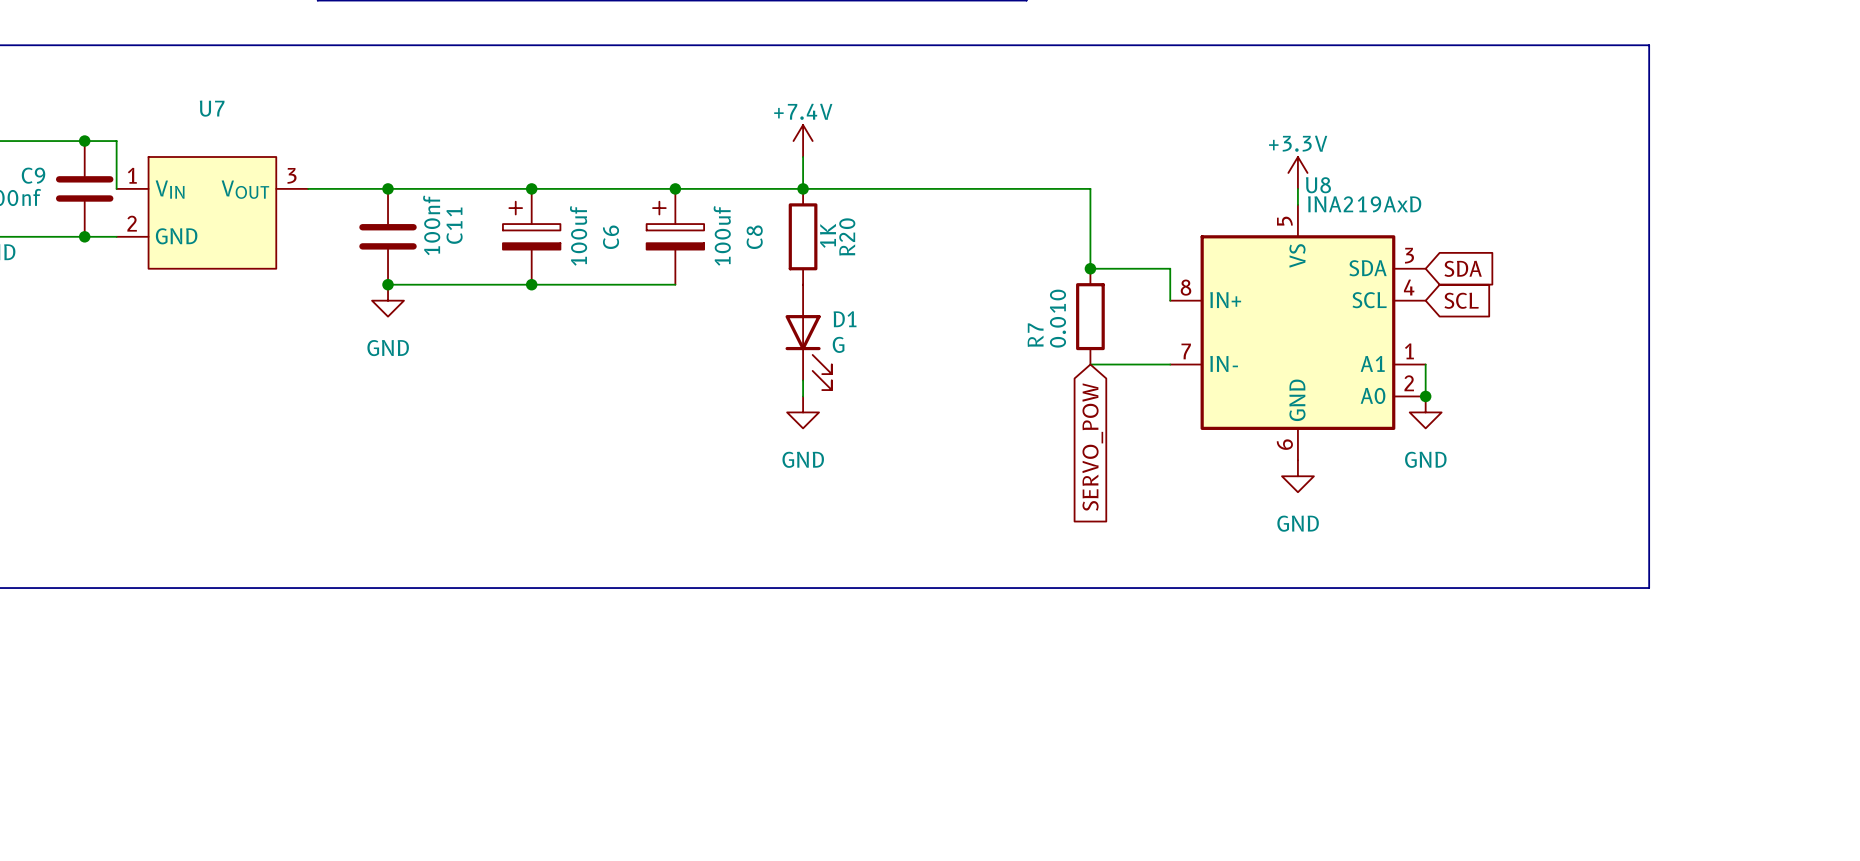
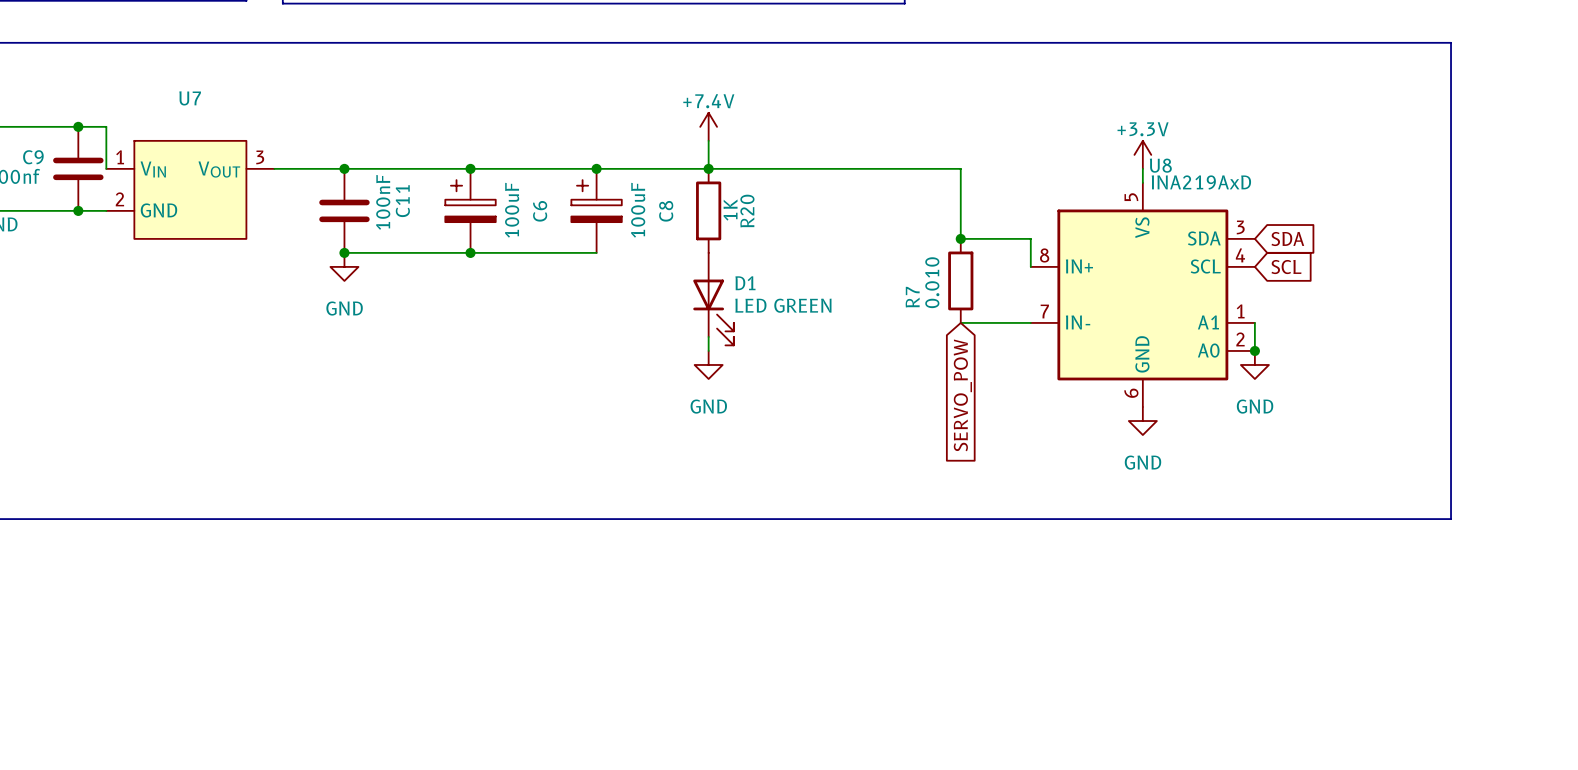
C11 value: 100nf (431, 225) -> 100nF (383, 202)
C6 value: 100uf (578, 235) -> 100uF (512, 210)
C8 value: 100uf (722, 235) -> 100uF (638, 210)
D1 value: G (838, 344) -> LED GREEN (783, 305)

